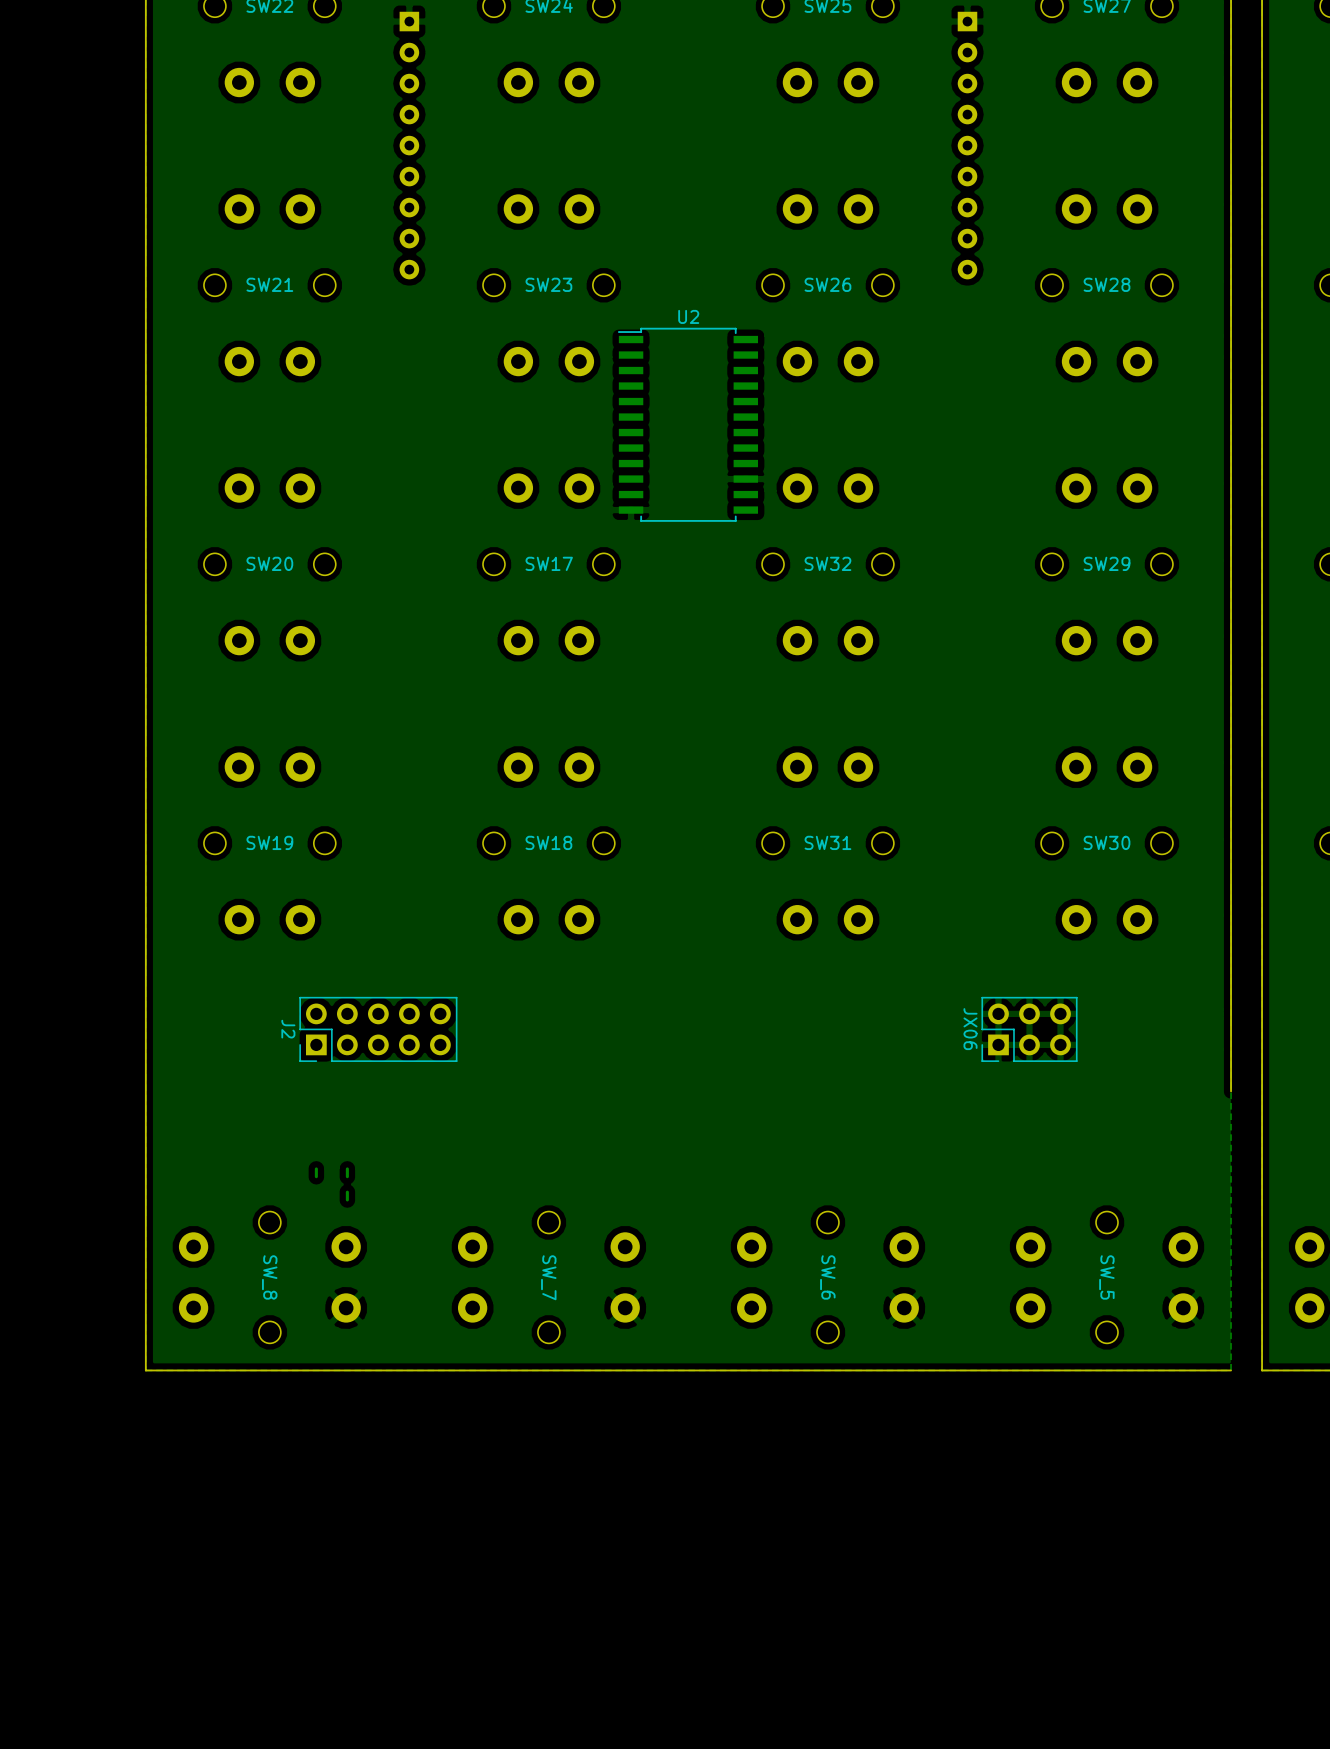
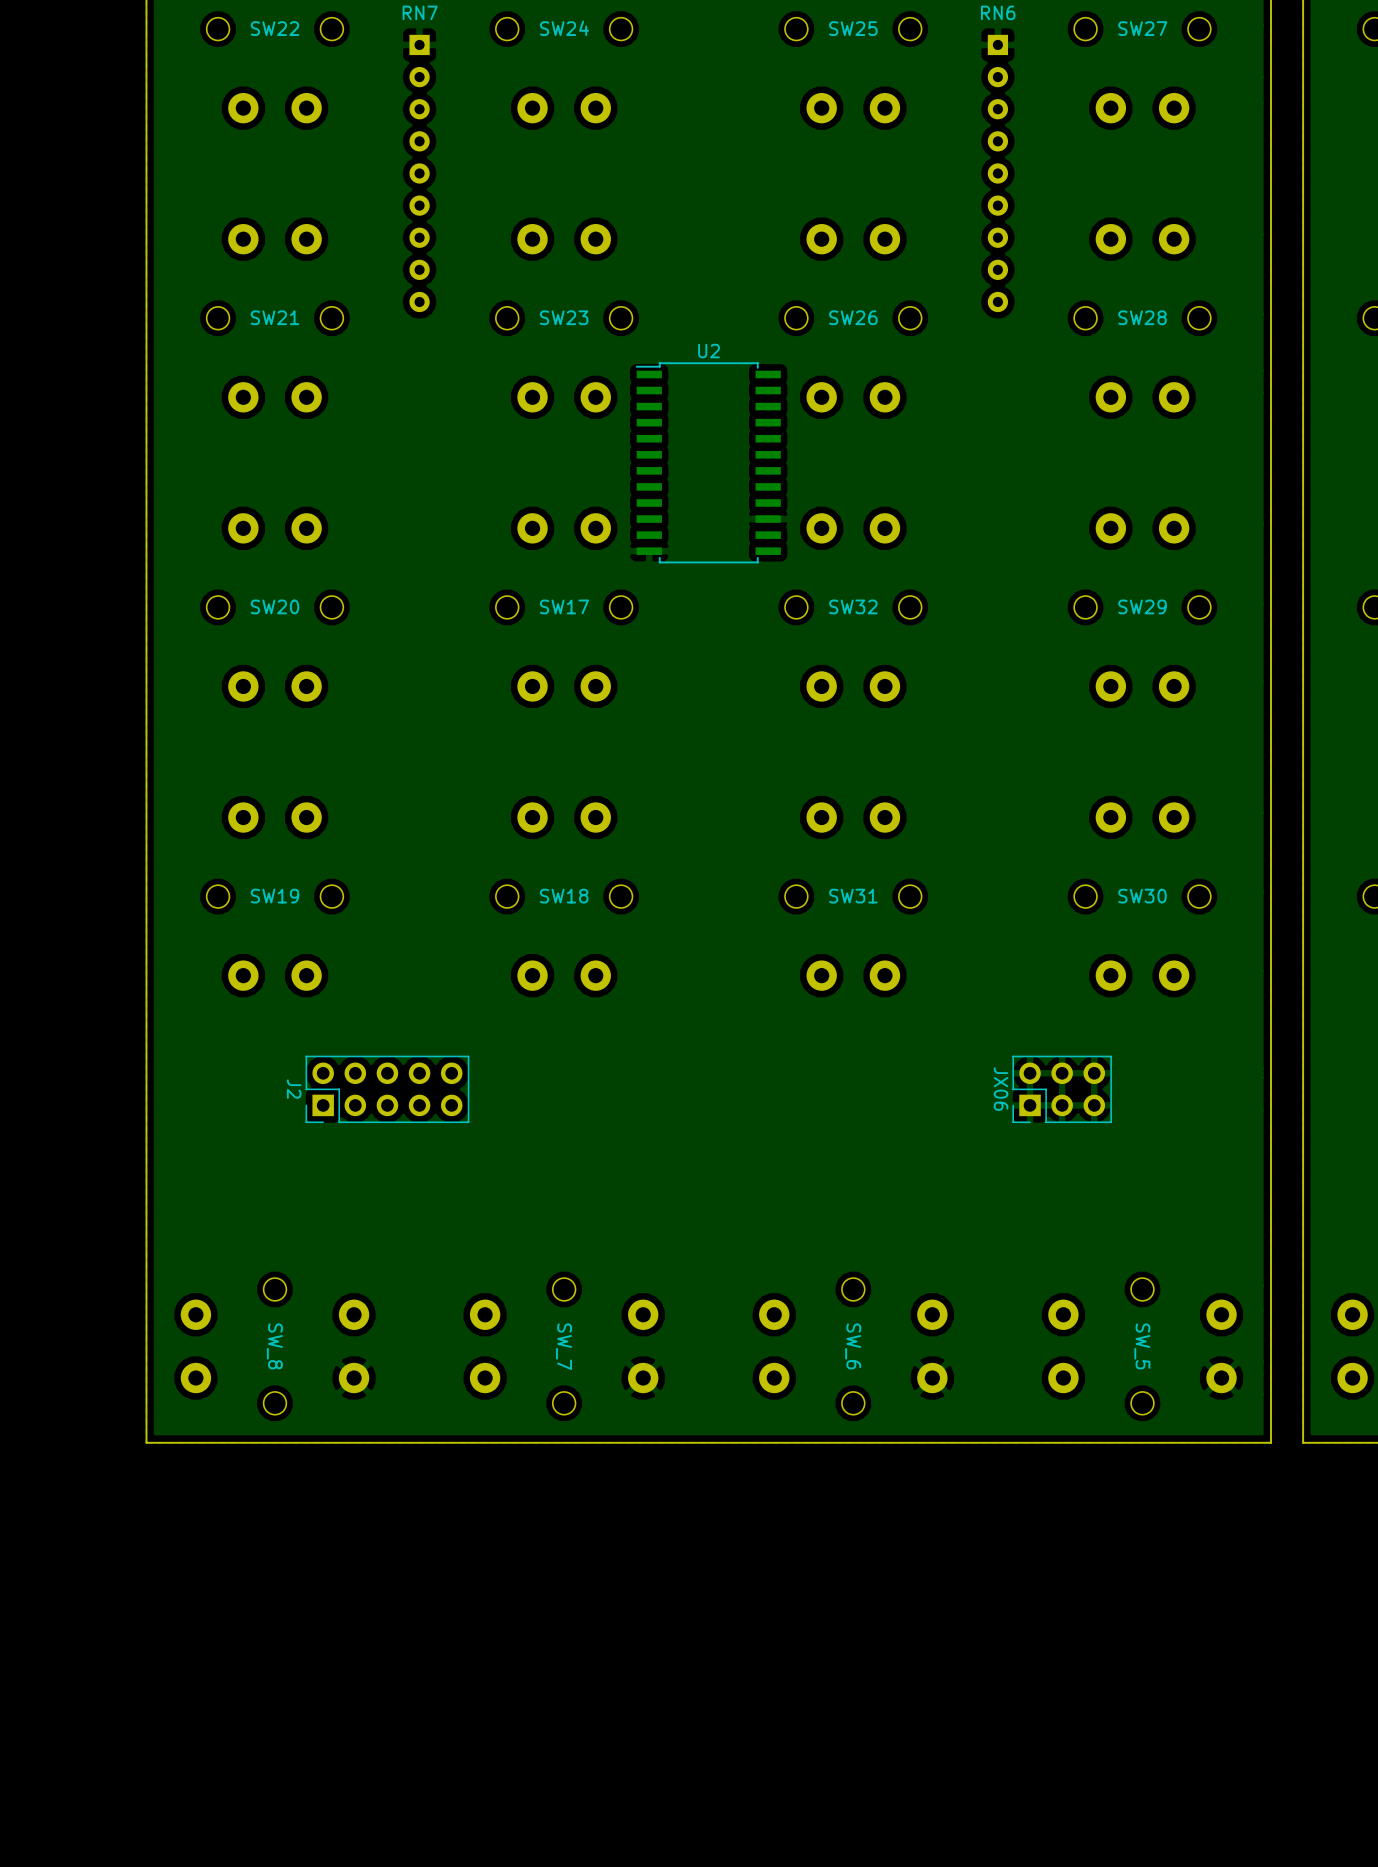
board edge: none -> (1271, 1153) (1271, 1442)
track: (316, 1168) (316, 1176) -> none
track: (347, 1168) (347, 1176) -> none
track: (347, 1192) (347, 1199) -> none

